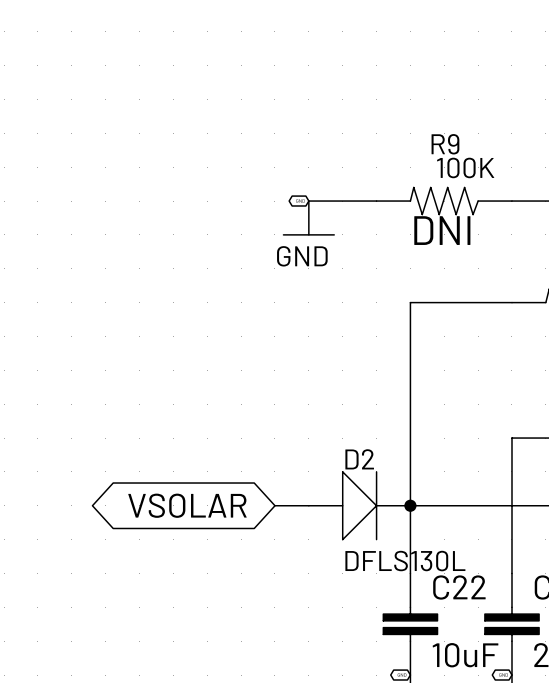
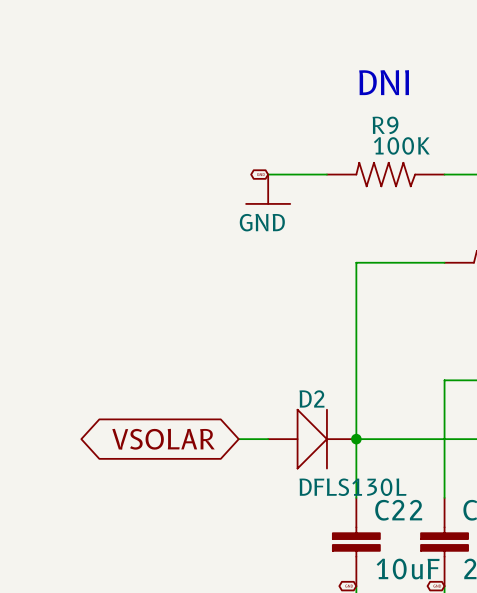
text position: DNI (442, 230) -> DNI (384, 82)

